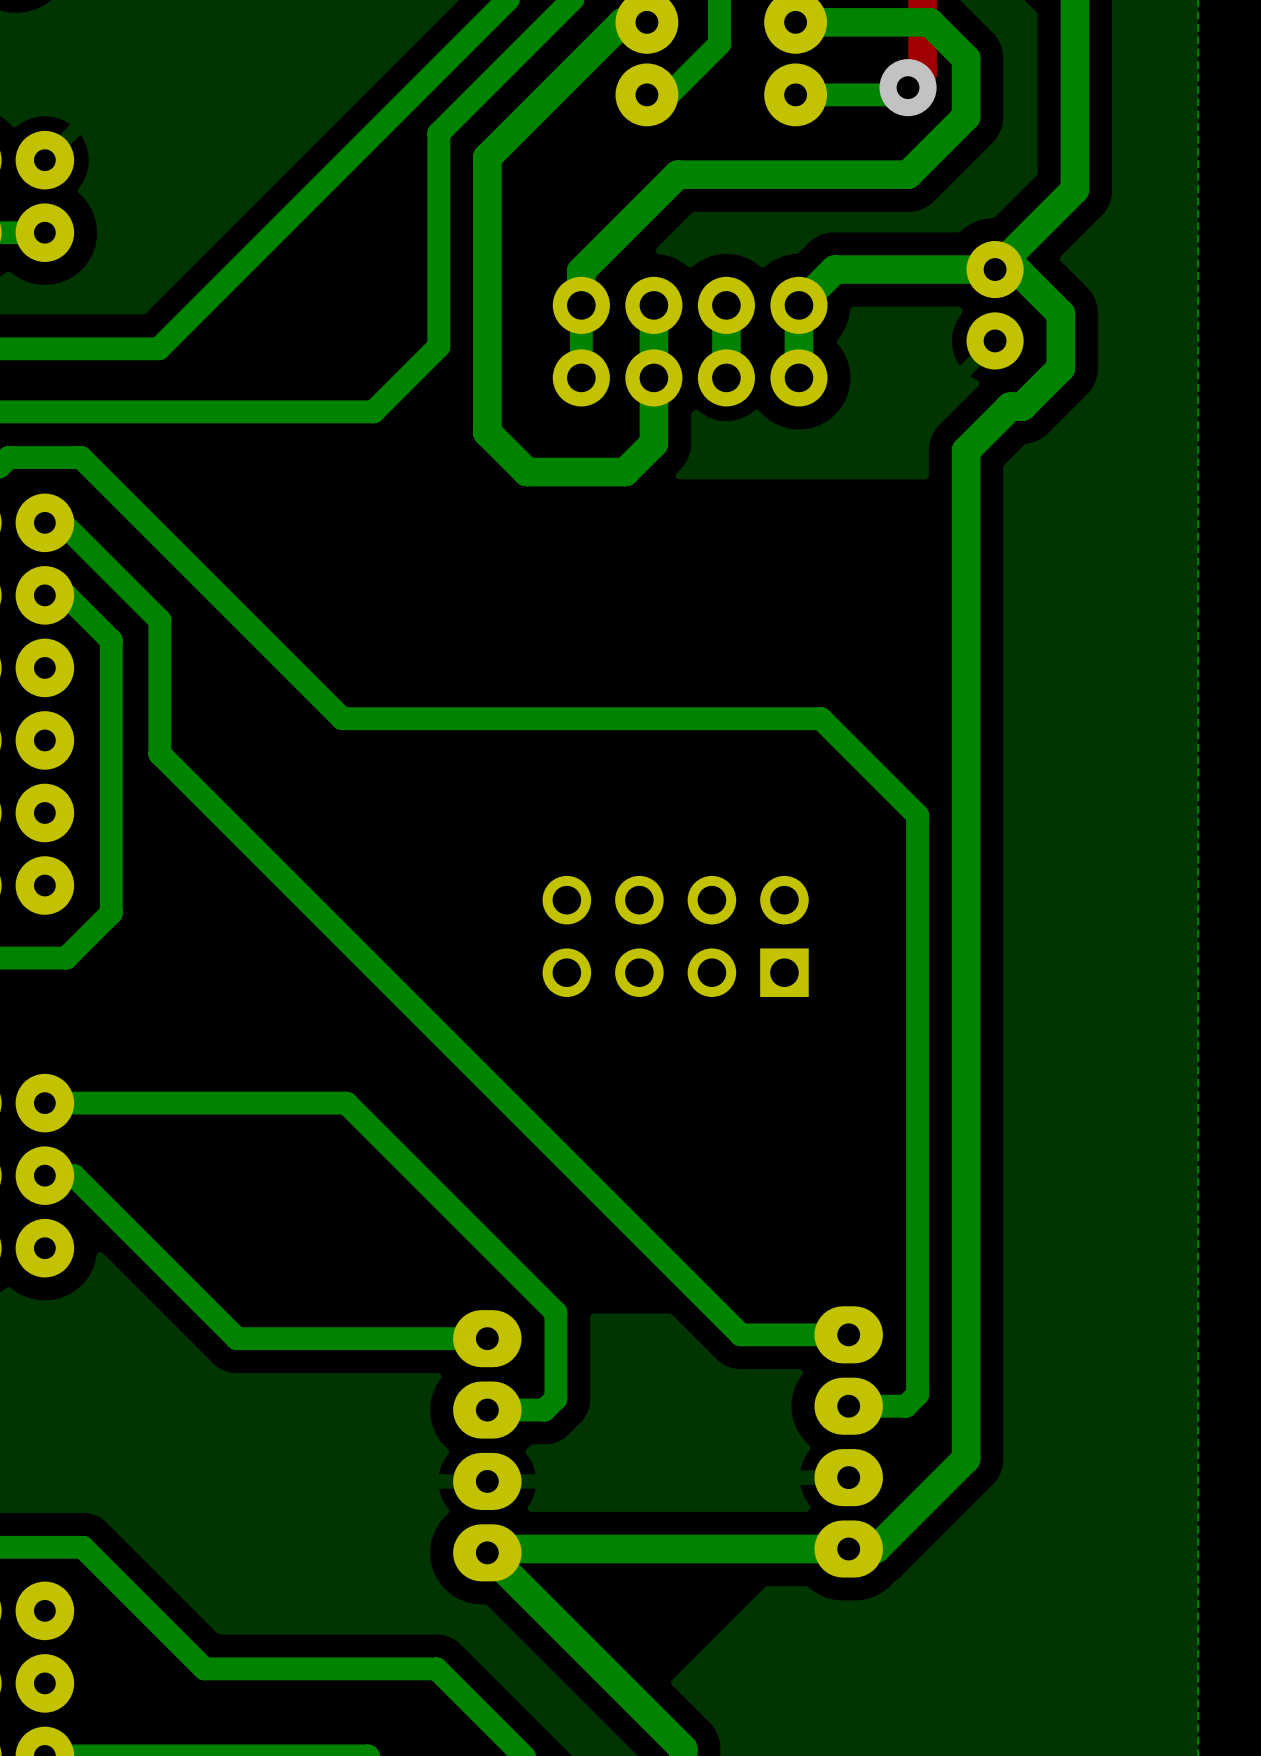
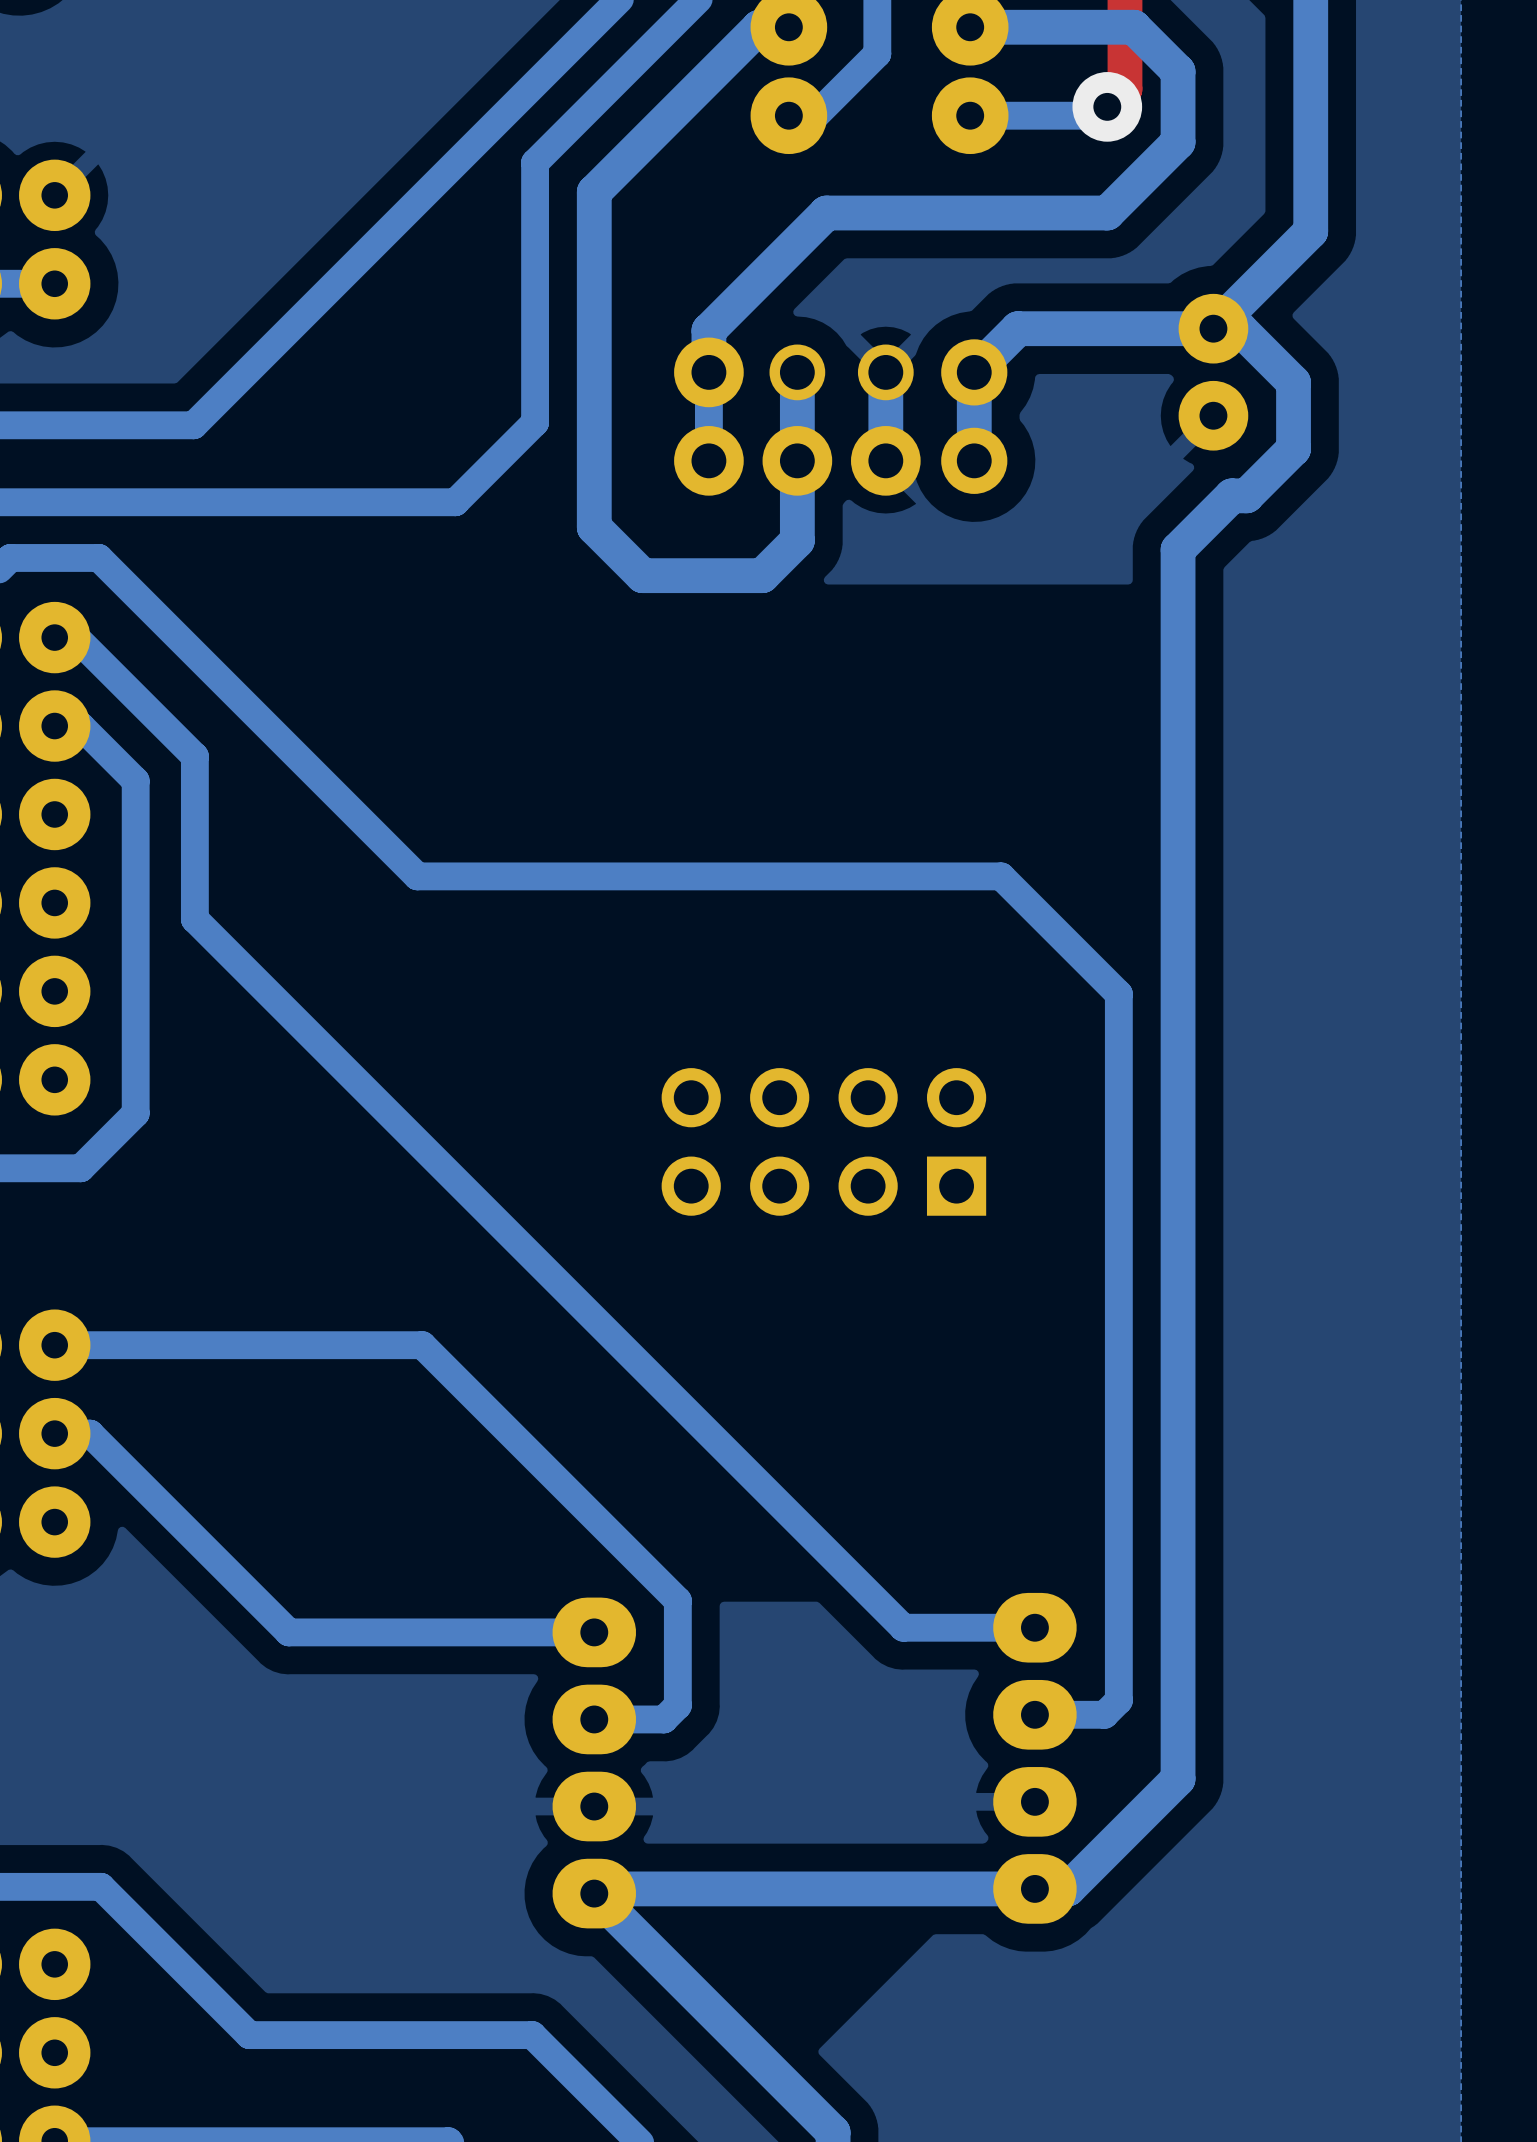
part footprint: [552, 276, 828, 407] -> [674, 337, 1008, 496]

